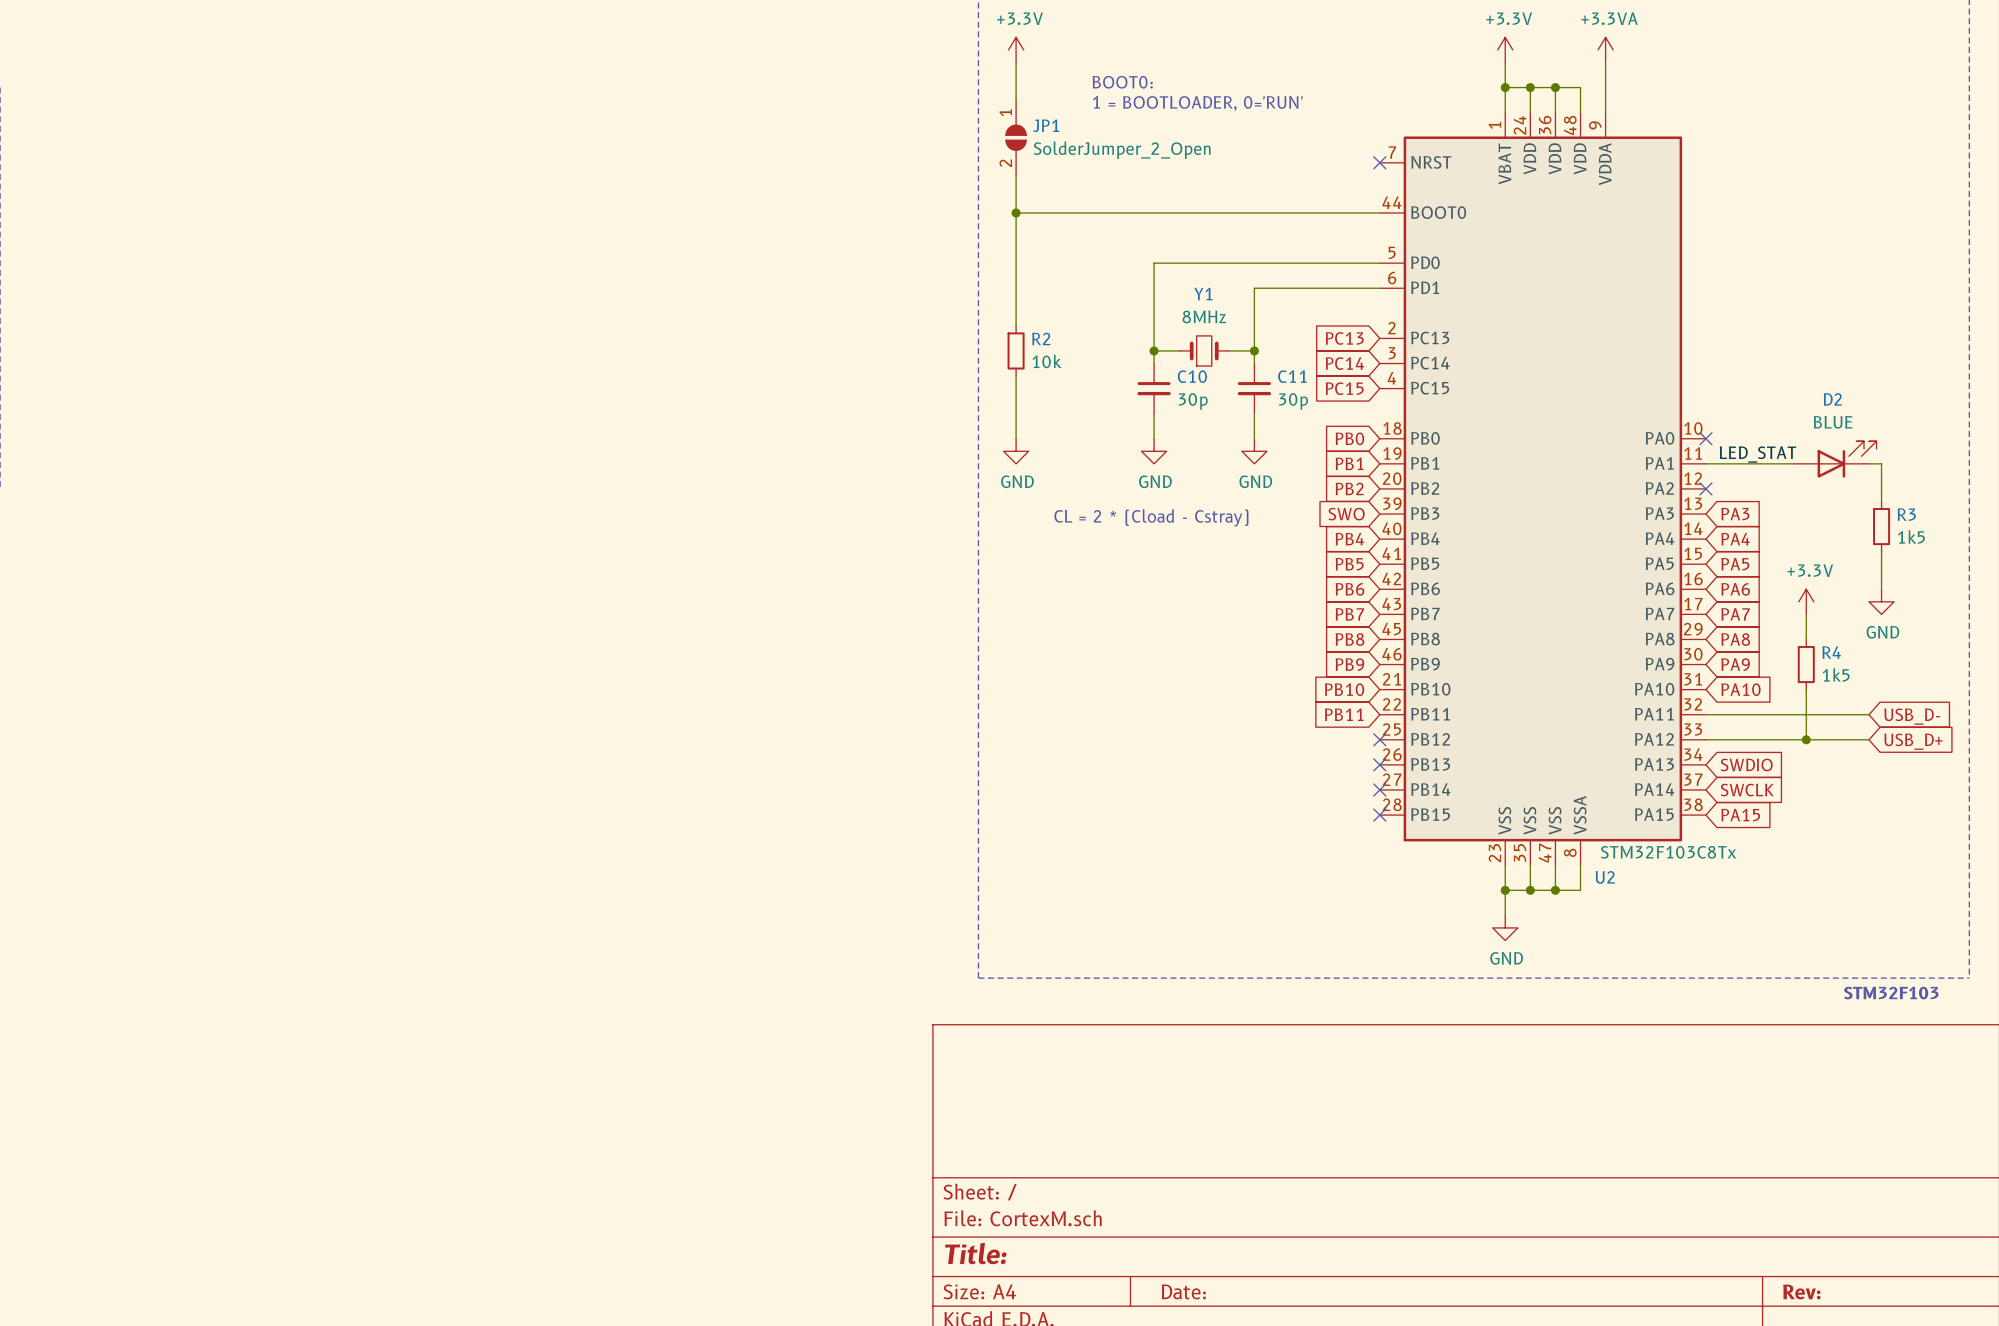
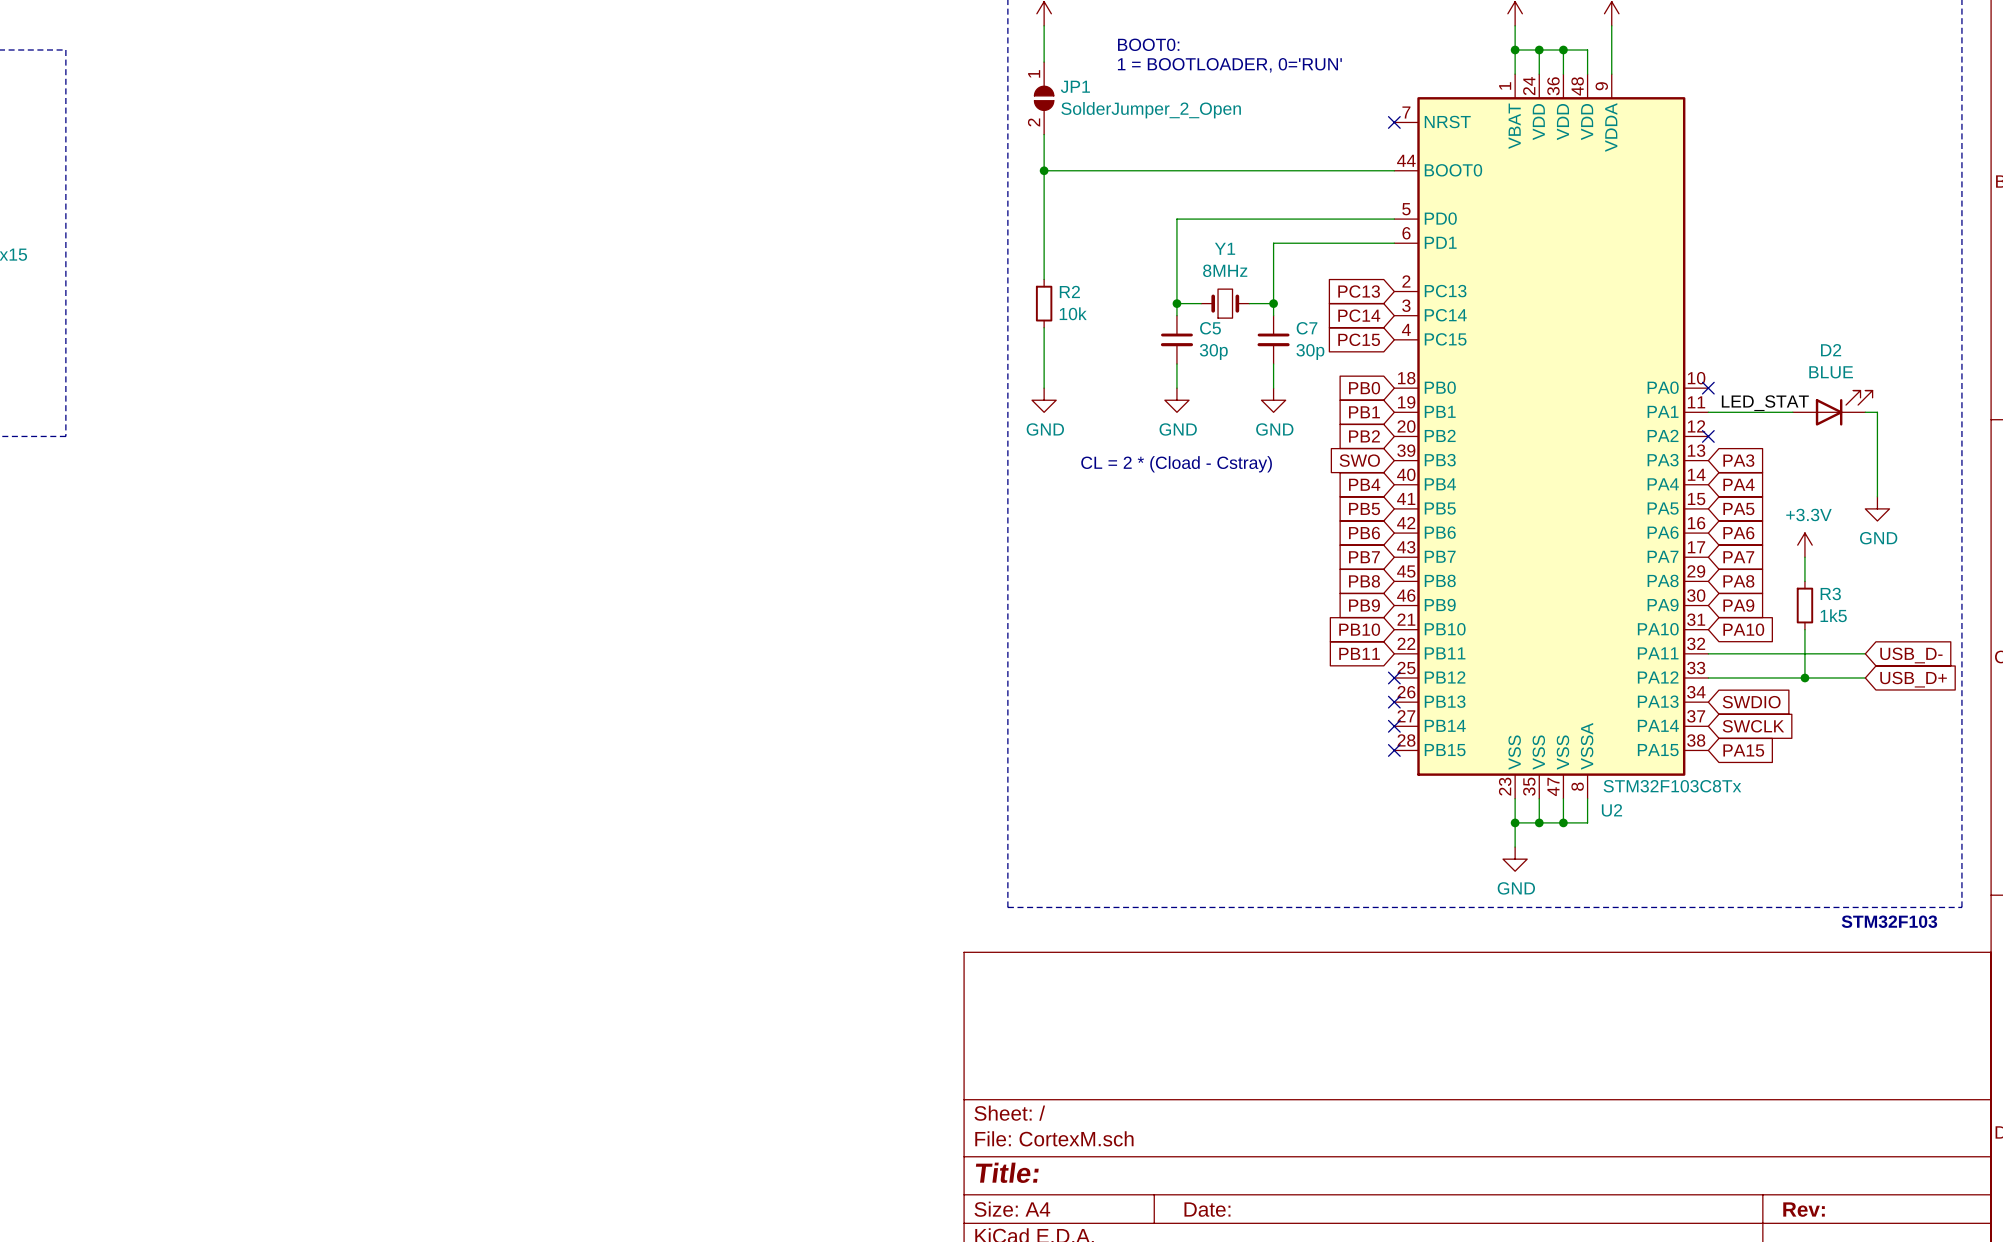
C10 name: C10 (1192, 376) -> C5 (1210, 328)
C11 name: C11 (1292, 376) -> C7 (1307, 328)
R3: 1k5 (1881, 526) -> none
wire: (1881, 551) (1881, 589) -> (1877, 496) (1877, 448)
power symbol position: GND (1881, 601) -> GND (1877, 508)
R4 name: R4 (1831, 652) -> R3 (1830, 593)

